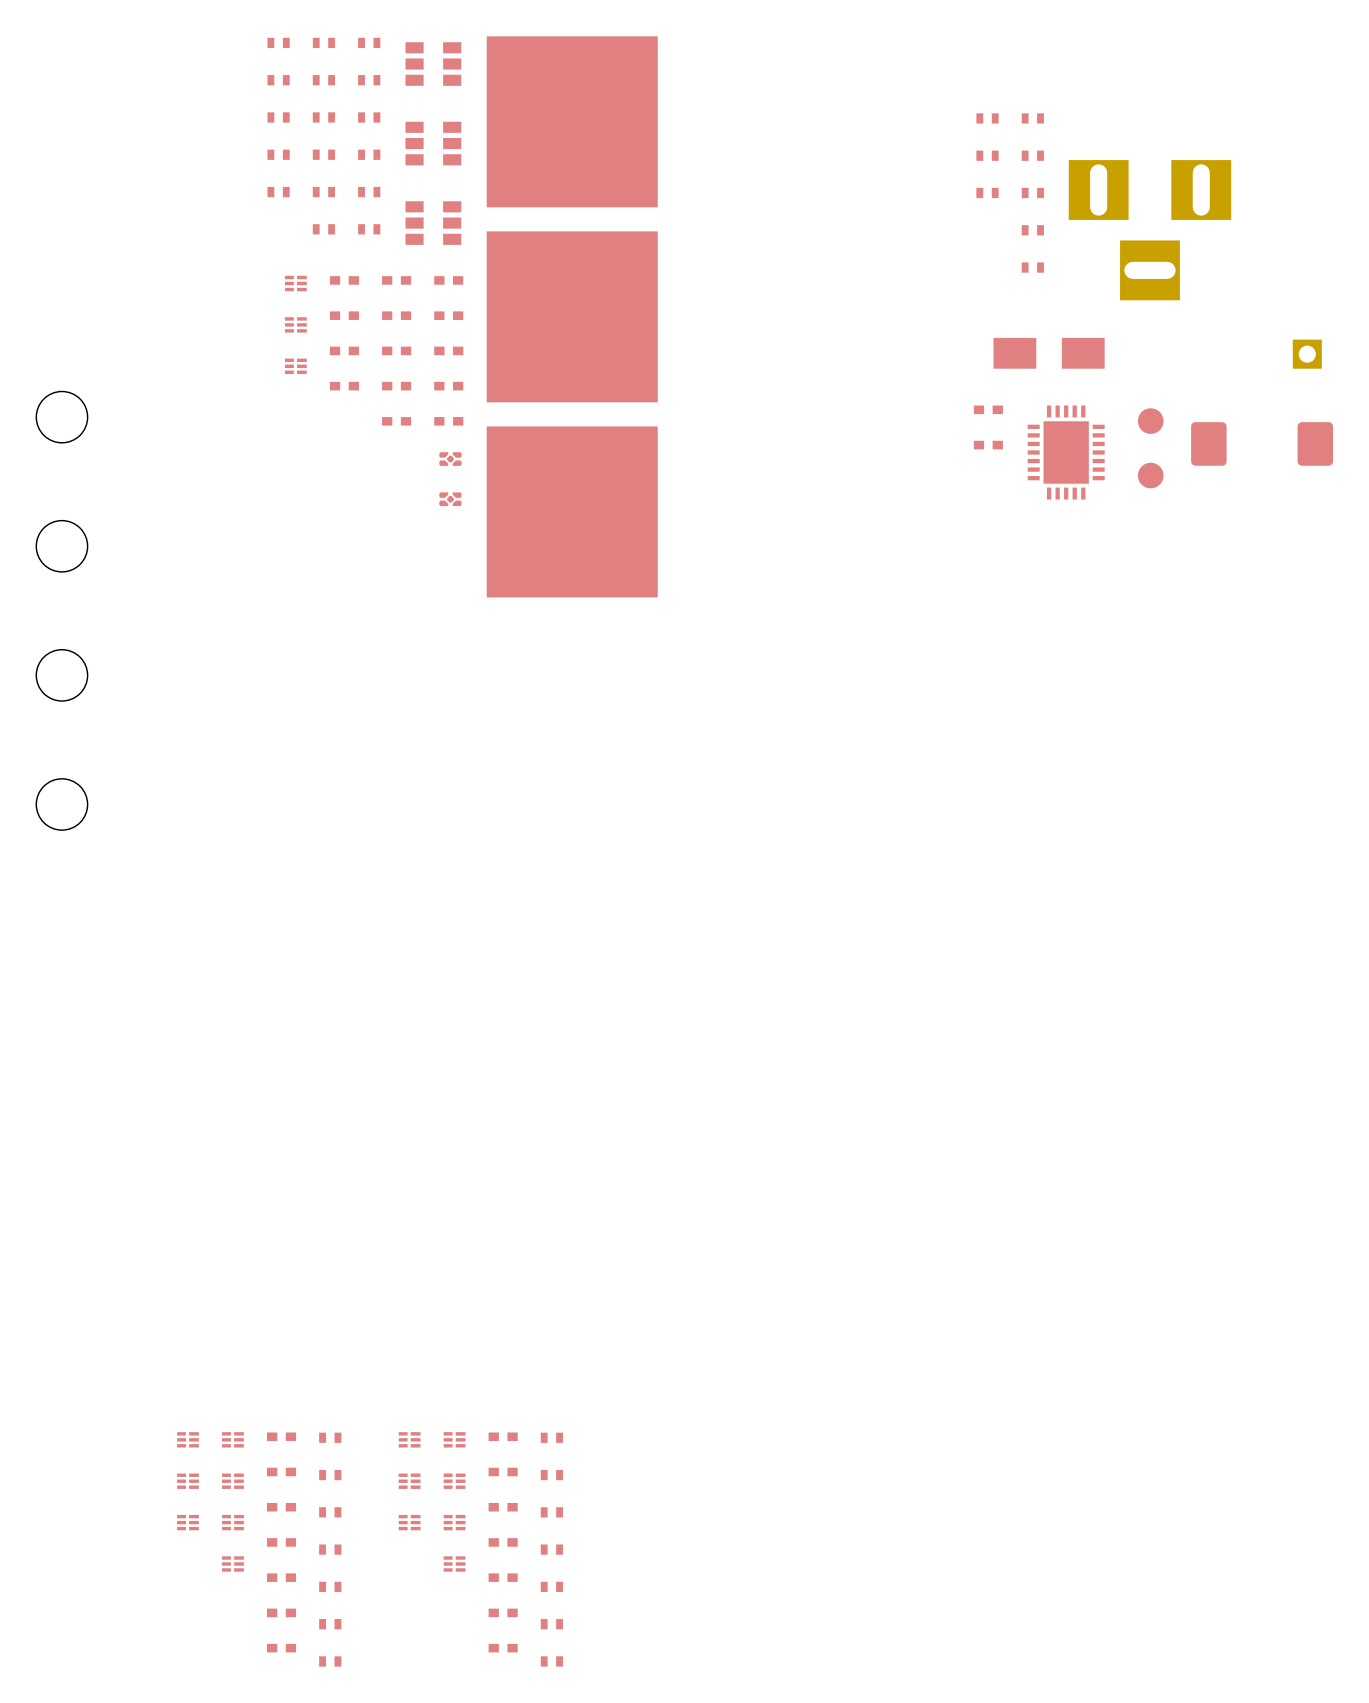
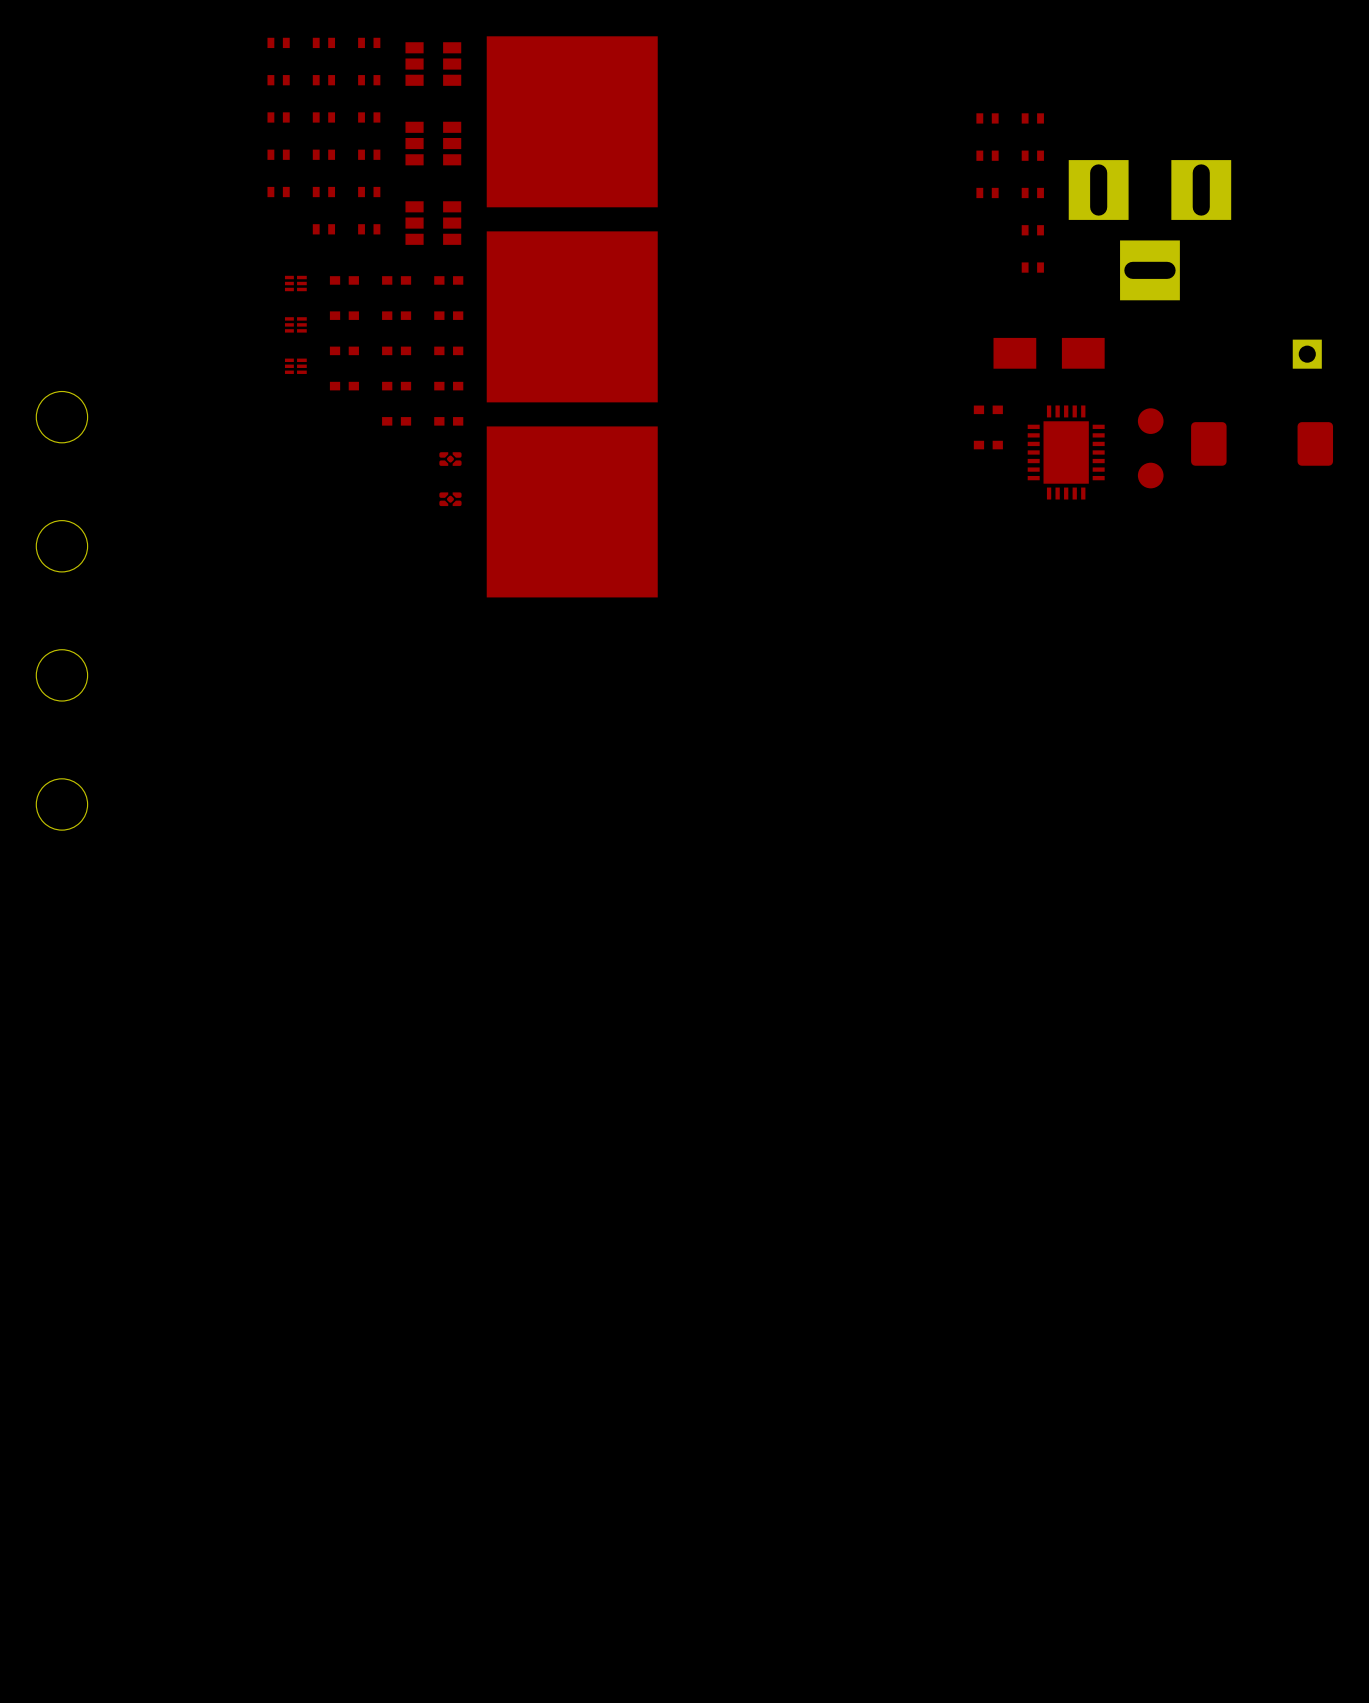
part: (281, 1436) -> none
part: (503, 1436) -> none
part: (330, 1437) -> none
part: (551, 1437) -> none
part: (187, 1439) -> none
part: (232, 1439) -> none
part: (409, 1439) -> none
part: (454, 1439) -> none
part: (281, 1471) -> none
part: (503, 1471) -> none
part: (330, 1475) -> none
part: (551, 1475) -> none
part: (187, 1481) -> none
part: (232, 1481) -> none
part: (409, 1481) -> none
part: (454, 1481) -> none
part: (281, 1507) -> none
part: (503, 1507) -> none
part: (330, 1512) -> none
part: (551, 1512) -> none
part: (187, 1522) -> none
part: (232, 1522) -> none
part: (409, 1522) -> none
part: (454, 1522) -> none
part: (281, 1542) -> none
part: (503, 1542) -> none
part: (330, 1549) -> none
part: (551, 1549) -> none
part: (232, 1563) -> none
part: (454, 1563) -> none
part: (281, 1577) -> none
part: (503, 1577) -> none
part: (330, 1586) -> none
part: (551, 1586) -> none
part: (281, 1612) -> none
part: (503, 1612) -> none
part: (330, 1624) -> none
part: (551, 1624) -> none
part: (281, 1648) -> none
part: (503, 1648) -> none
part: (330, 1661) -> none
part: (551, 1661) -> none

